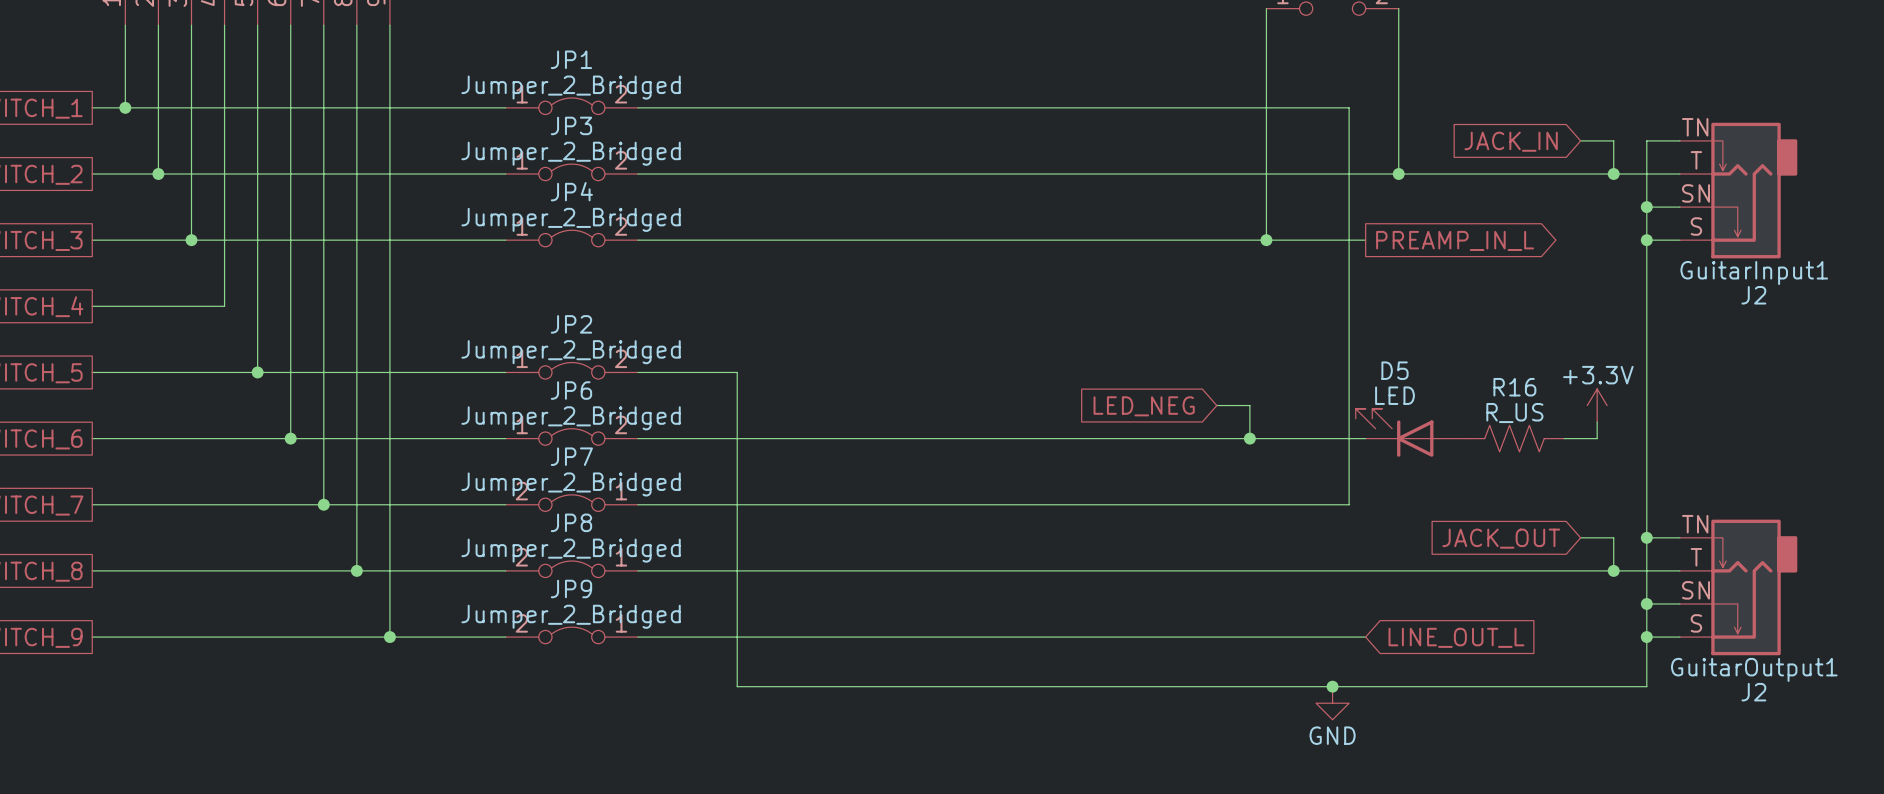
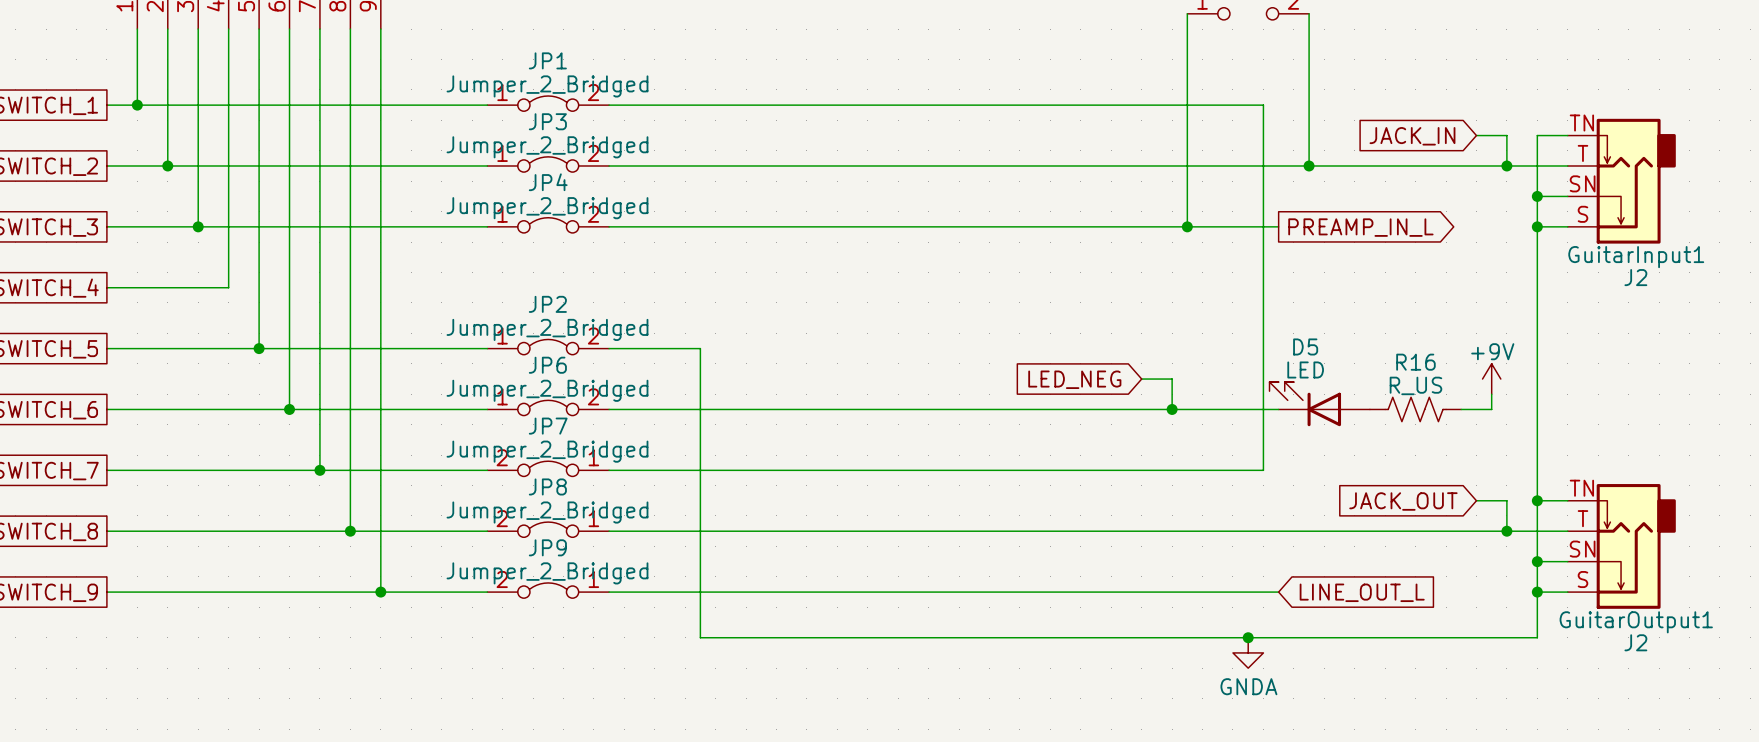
power symbol: +3.3V (1597, 405) -> +9V (1491, 379)
power symbol: GND (1332, 703) -> GNDA (1248, 652)

